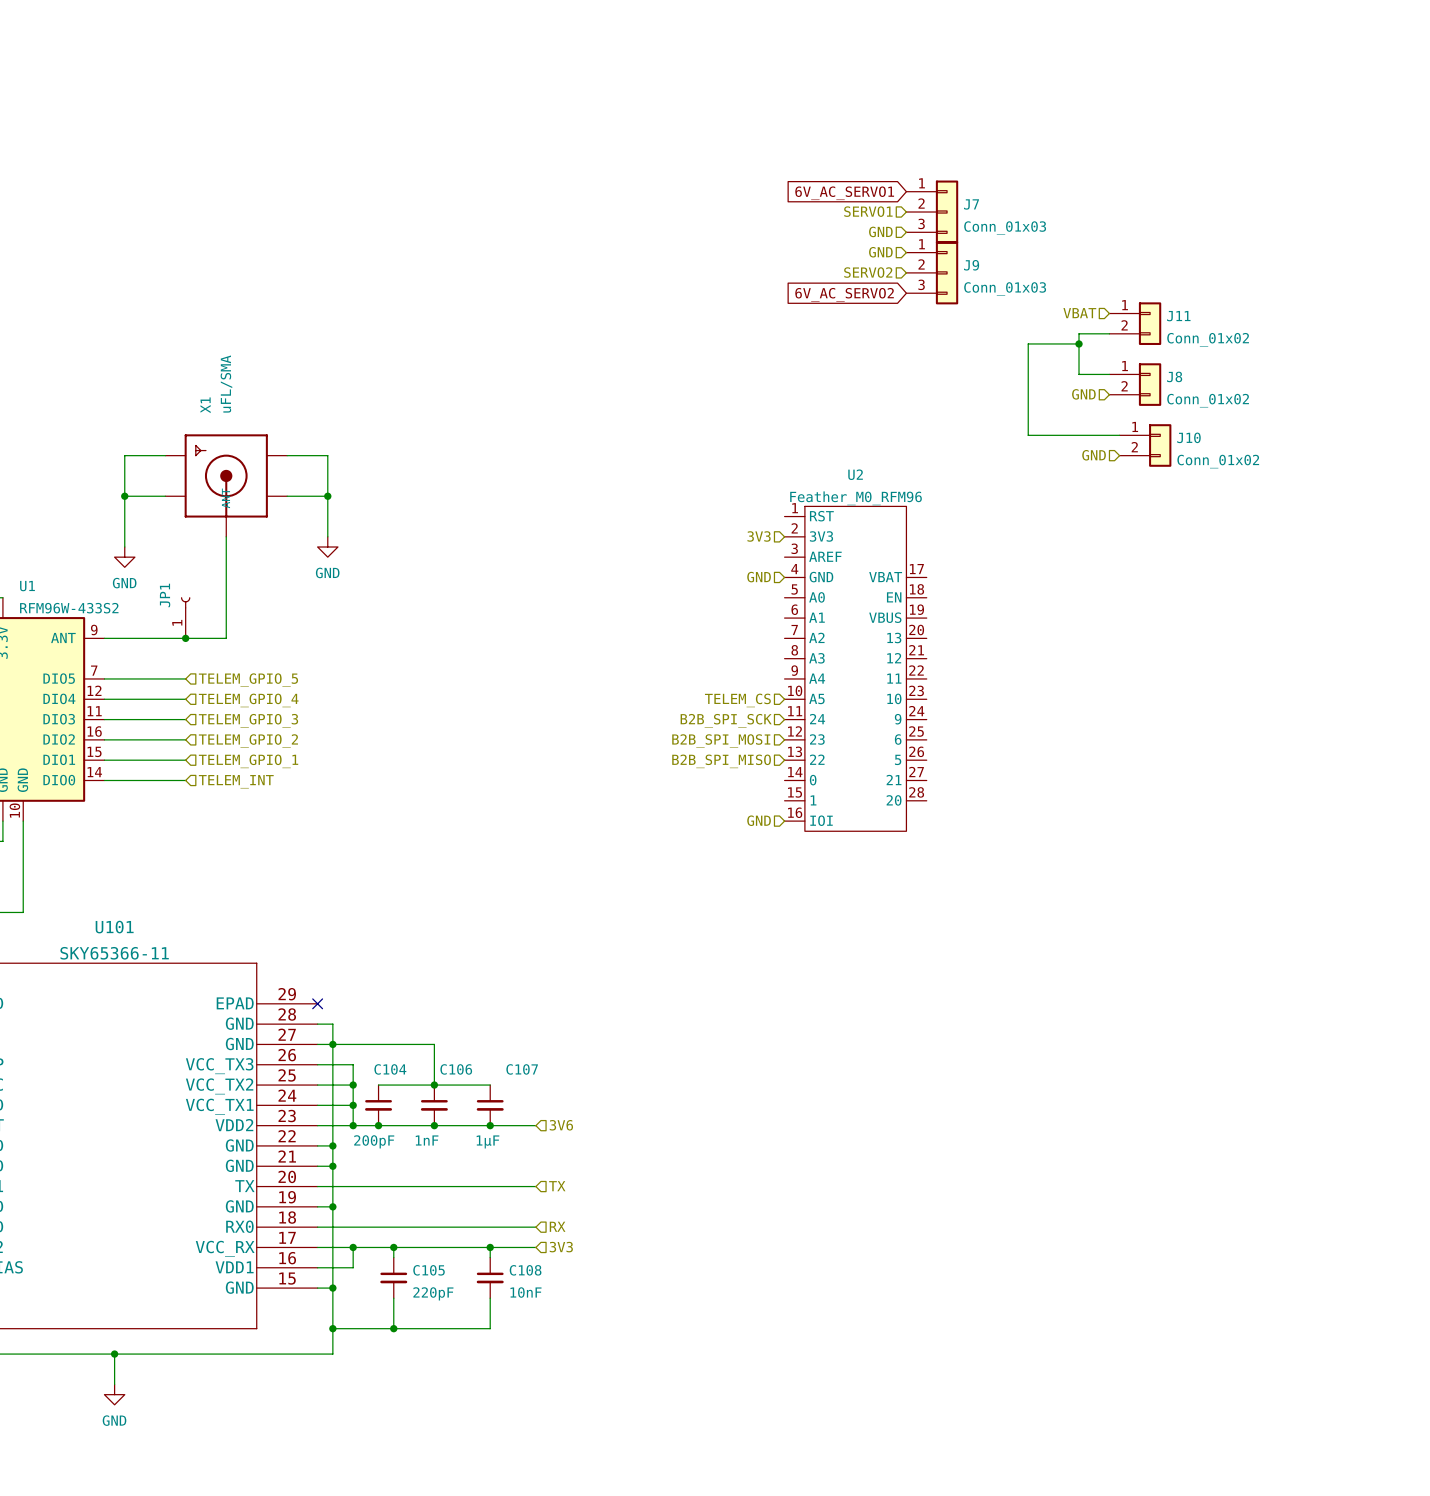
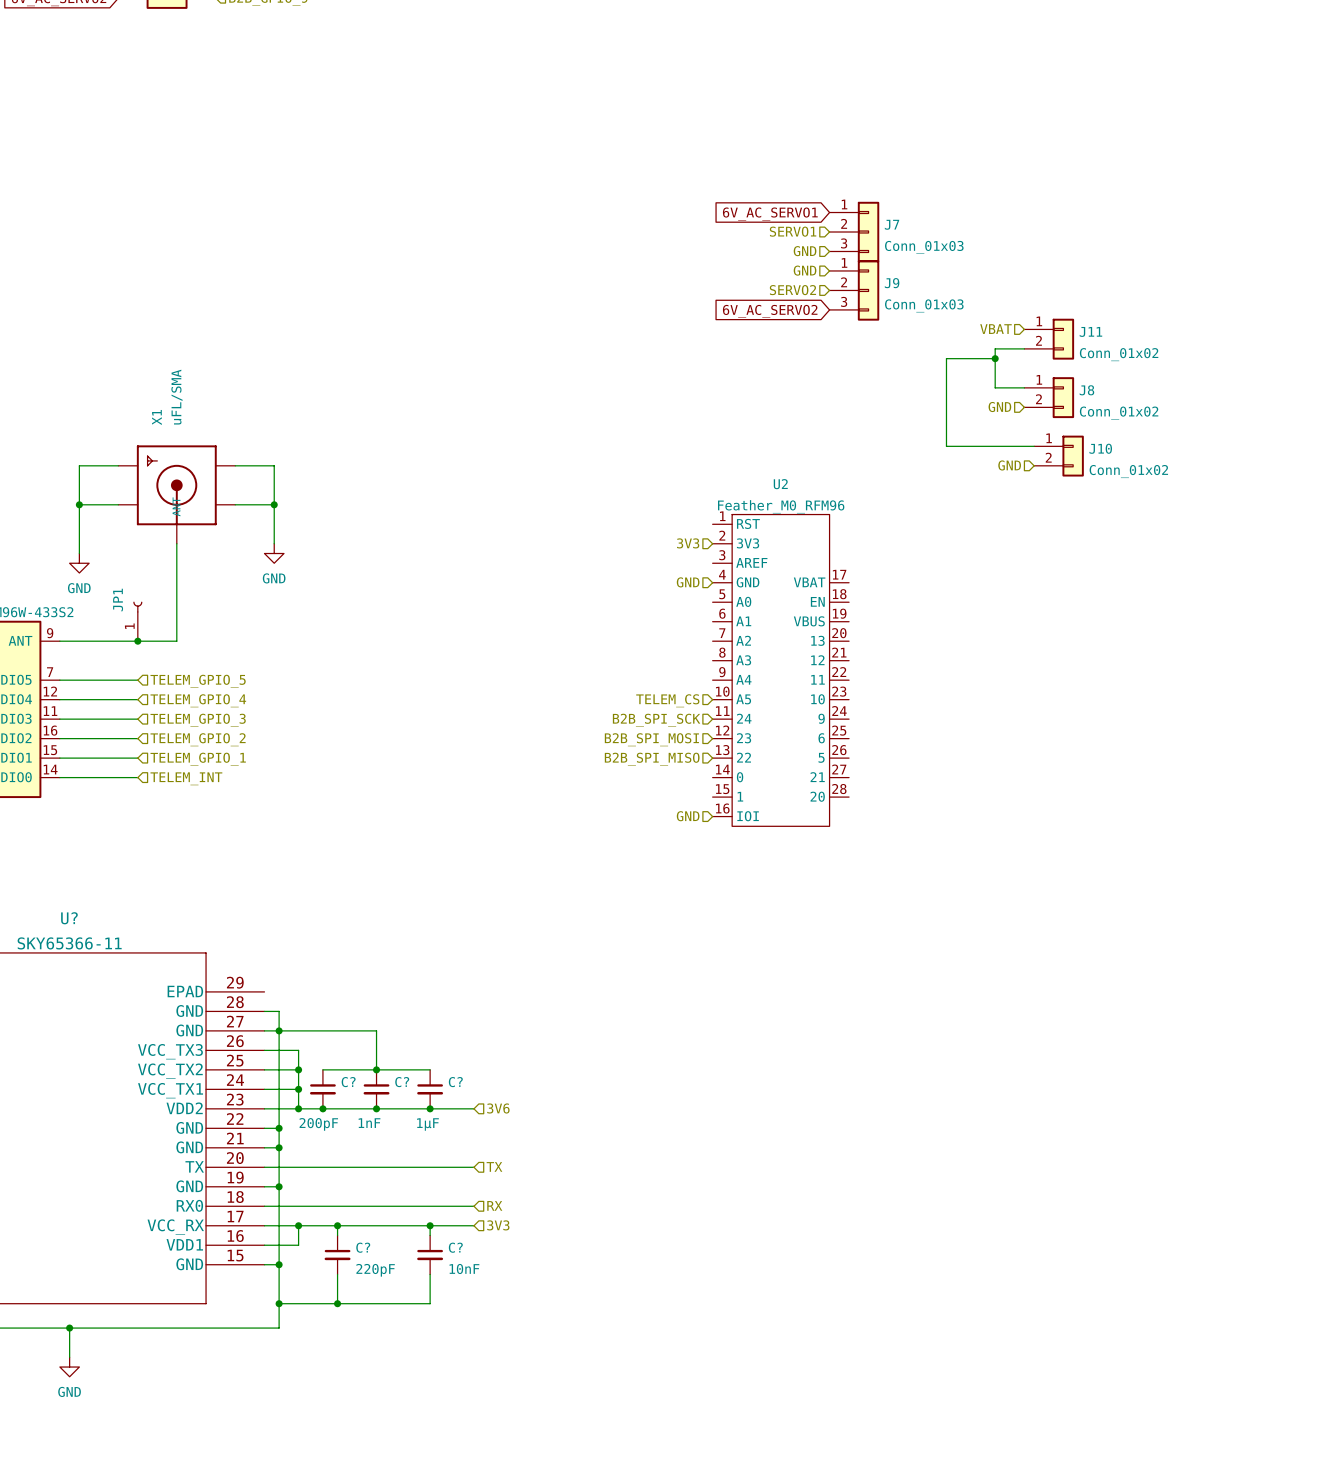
U101 name: U101 (114, 927) -> U? (69, 918)
no-connect mark: (317, 1003) -> none
C104 name: C104 (390, 1069) -> C? (348, 1082)
C106 name: C106 (456, 1069) -> C? (402, 1082)
C107 name: C107 (522, 1069) -> C? (455, 1082)
C105 name: C105 (429, 1270) -> C? (363, 1247)
C108 name: C108 (525, 1270) -> C? (455, 1247)

